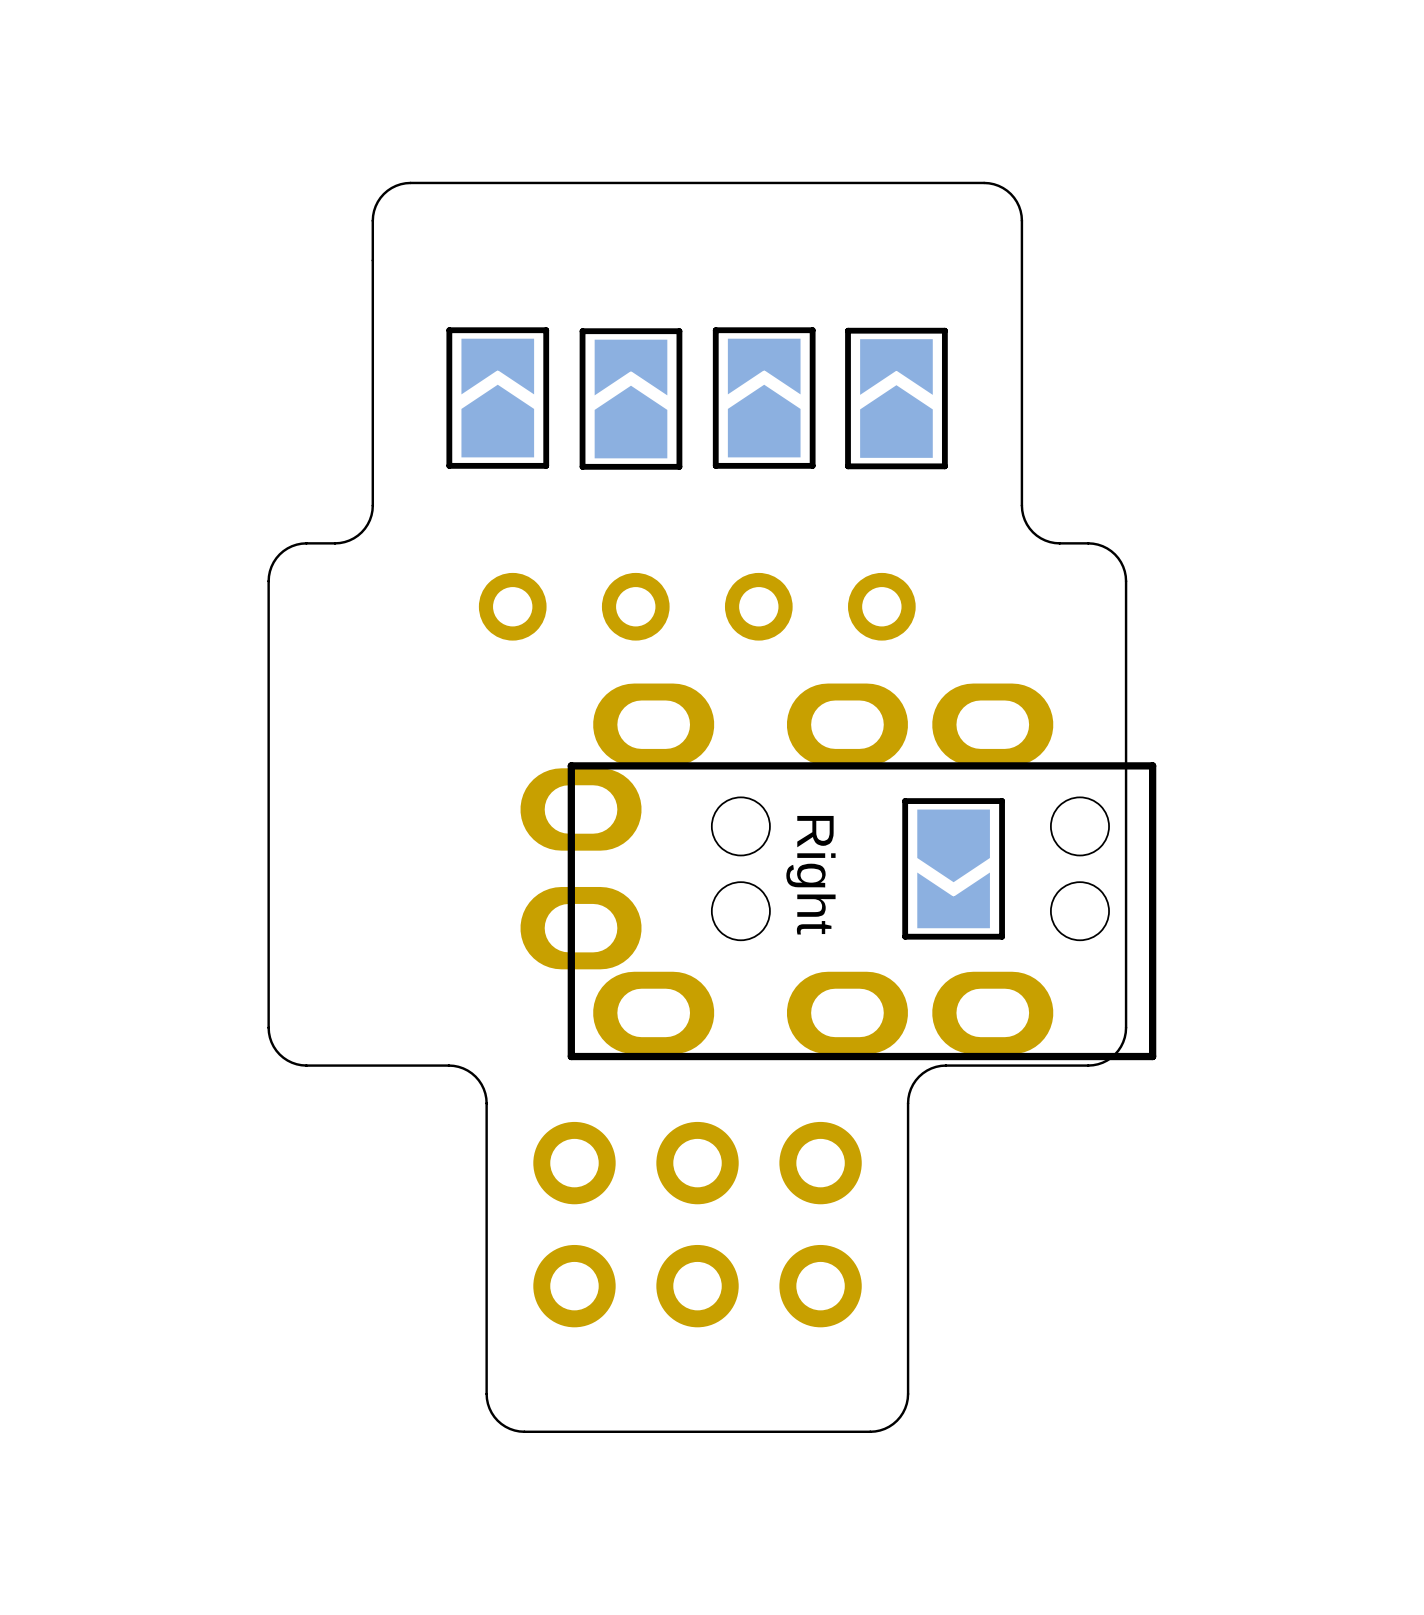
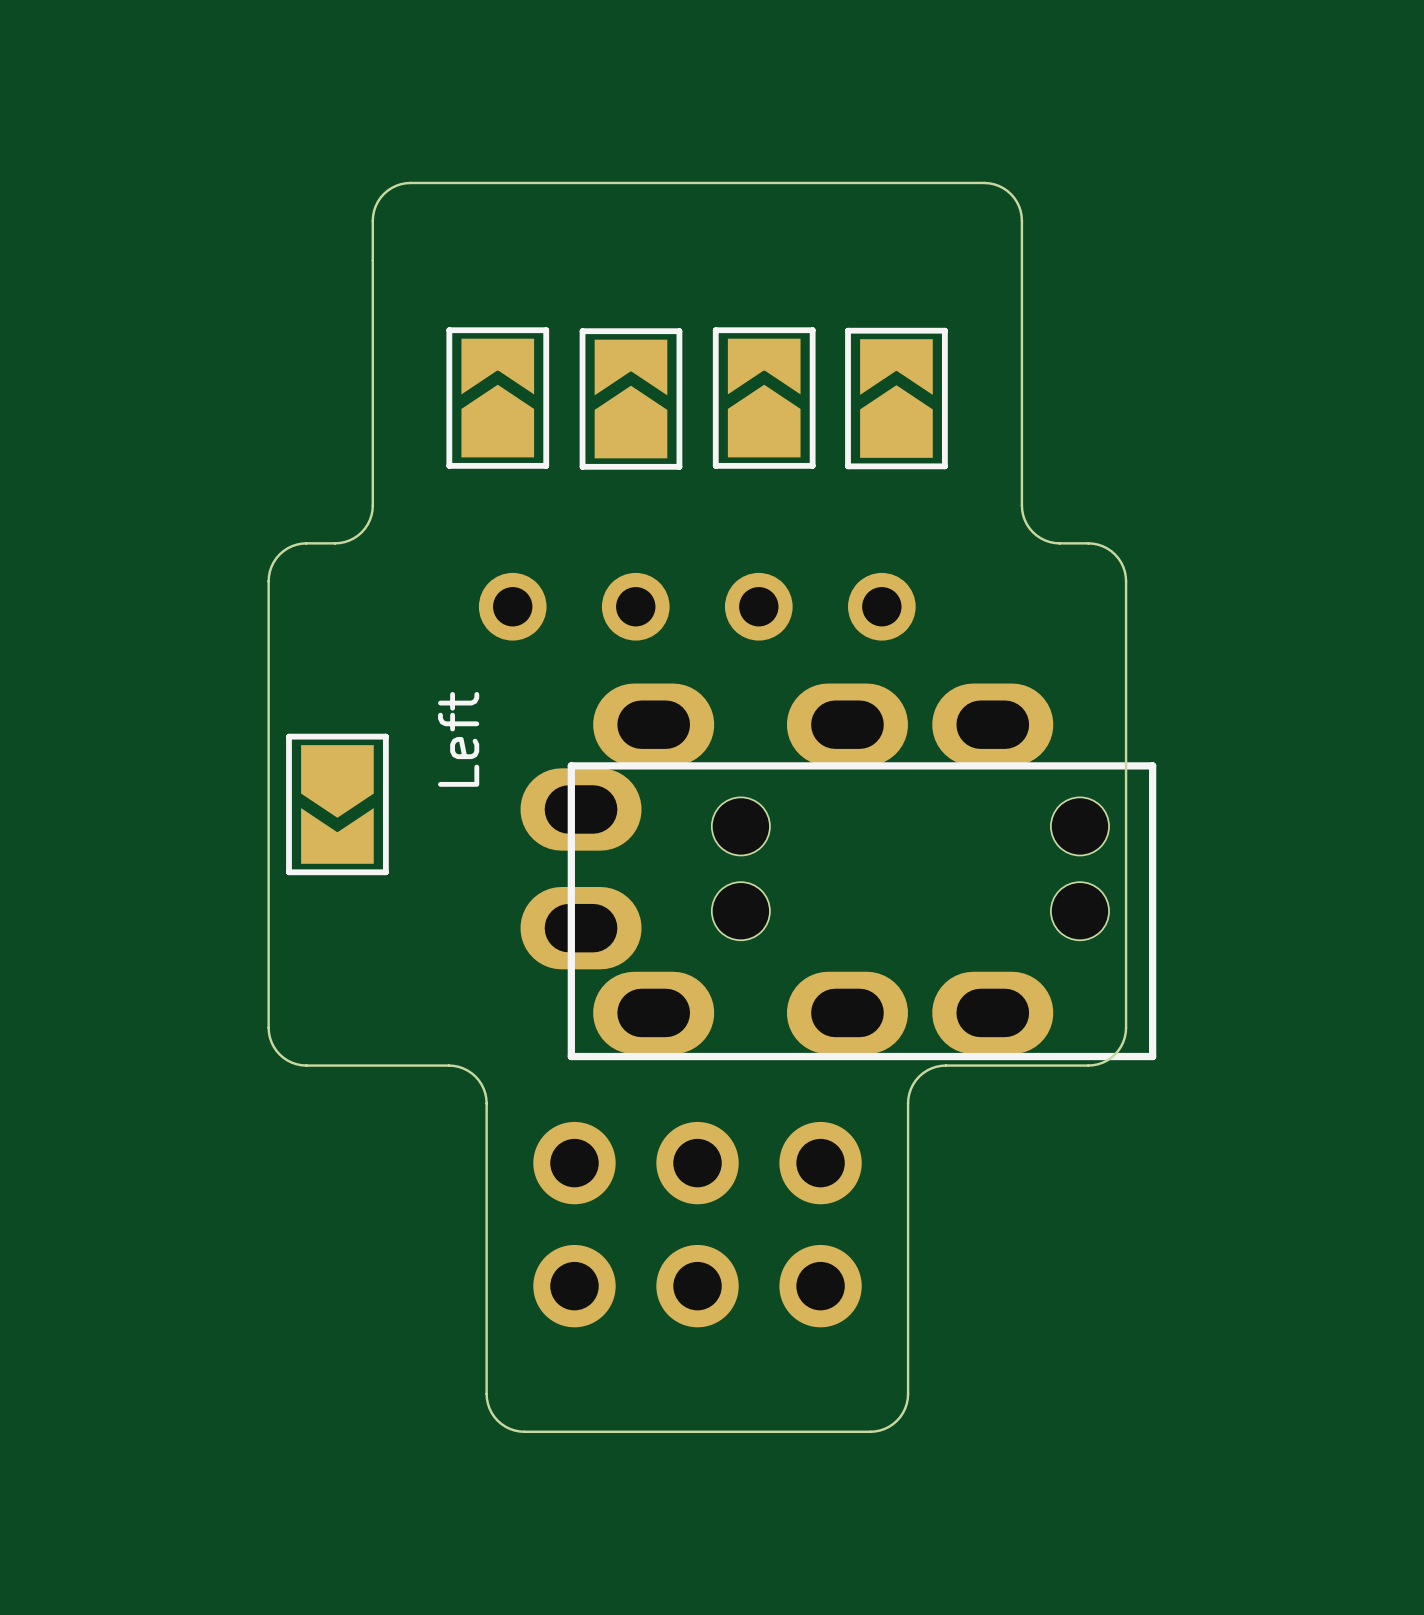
text: none -> Left (458, 739)
part position: (953, 868) -> (337, 804)
text: Right (810, 875) -> none

